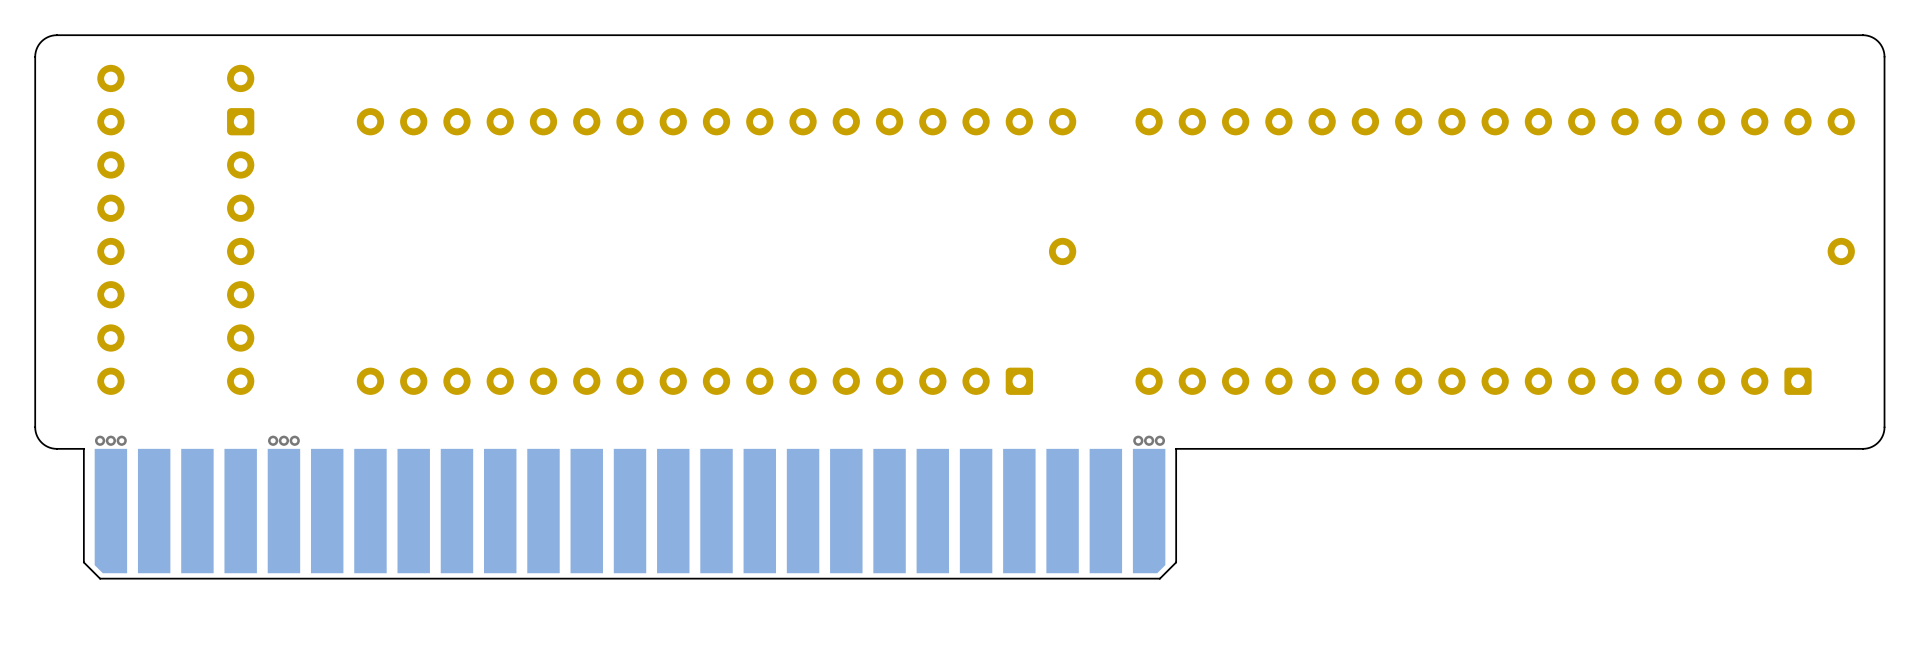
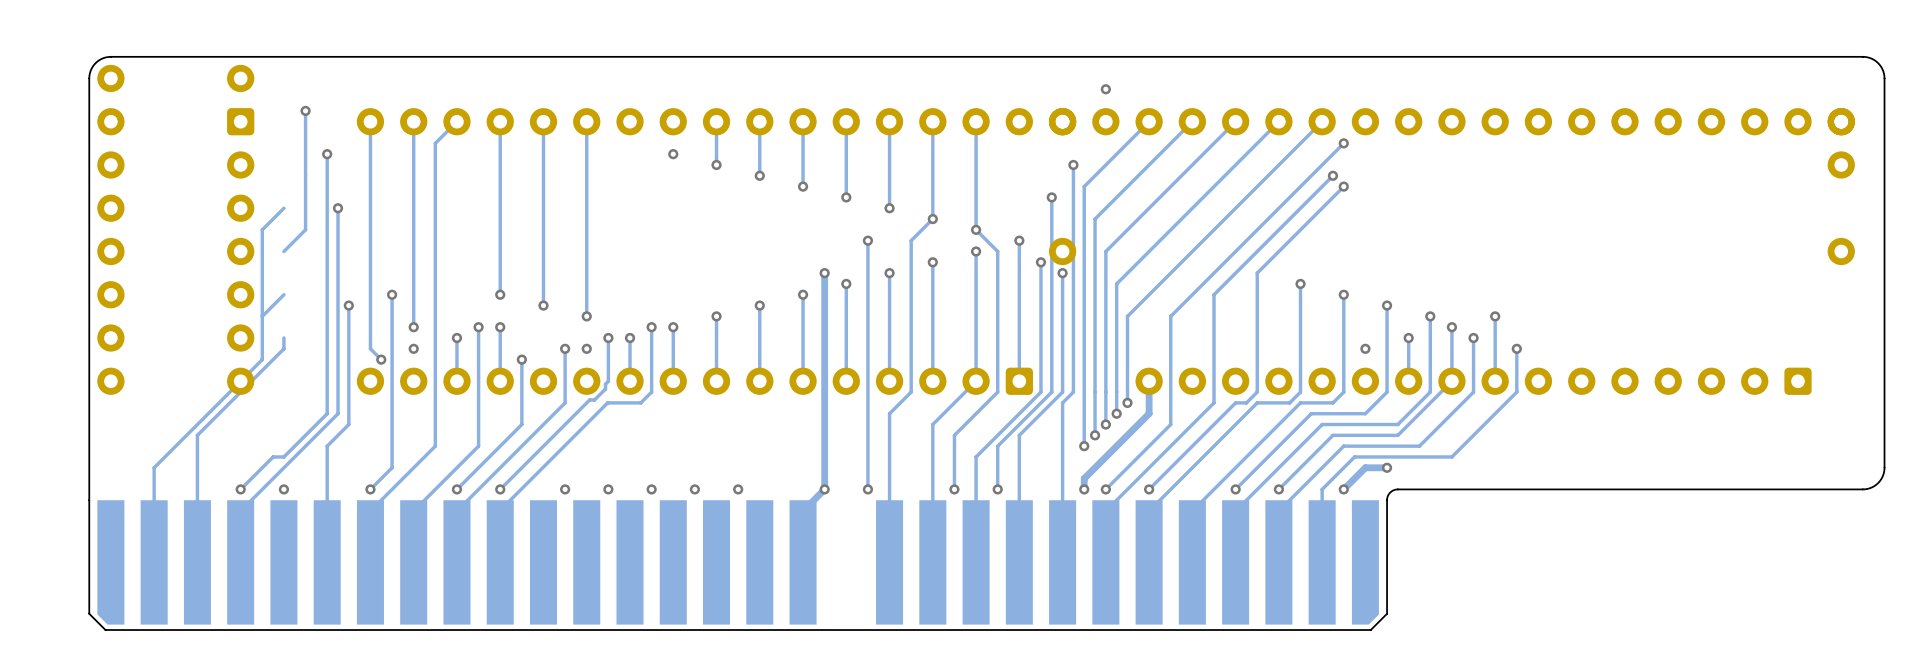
board edge: (1884, 78) (1884, 54) (1882, 47) (1874, 38) (1862, 35) (52, 35) (39, 43) (35, 56) (35, 429) (39, 440) (49, 447) (83, 448) -> (1884, 78) (1883, 71) (1878, 63) (1870, 58) (1862, 56) (106, 57) (93, 64) (89, 78) (89, 500)
via: none -> (1105, 89)
track: none -> (305, 110) (305, 229) (283, 251)
via: none -> (305, 110)
track: none -> (370, 121) (370, 348) (381, 359)
track: none -> (413, 121) (413, 327)
track: none -> (456, 121) (435, 143) (435, 446) (370, 511) (370, 562)
track: none -> (500, 121) (500, 294)
track: none -> (543, 121) (543, 305)
track: none -> (586, 121) (586, 316)
track: none -> (716, 121) (716, 164)
track: none -> (759, 121) (759, 175)
track: none -> (803, 121) (803, 186)
track: none -> (846, 121) (846, 197)
track: none -> (889, 121) (889, 208)
track: none -> (932, 121) (932, 219) (911, 240) (911, 392) (889, 413) (889, 562)
track: none -> (976, 121) (976, 229) (997, 251) (997, 392) (954, 435) (954, 489)
part: none -> (1084, 121)
track: none -> (1149, 121) (1084, 186) (1084, 446)
track: none -> (1192, 121) (1095, 219) (1095, 435)
track: none -> (1235, 121) (1105, 251) (1105, 424)
track: none -> (1278, 121) (1116, 283) (1116, 413)
track: none -> (1322, 121) (1127, 316) (1127, 402)
track: none -> (1343, 143) (1170, 316) (1170, 424) (1105, 489)
via: none -> (1343, 143)
part: none -> (1841, 143)
track: none -> (327, 154) (327, 413) (283, 456) (273, 456) (240, 489)
via: none -> (327, 154)
via: none -> (673, 154)
via: none -> (716, 164)
track: none -> (1073, 164) (1073, 392) (1062, 402) (1062, 562)
via: none -> (1073, 164)
via: none -> (759, 175)
track: none -> (1332, 175) (1214, 294) (1214, 402) (1105, 511) (1105, 562)
via: none -> (1332, 175)
via: none -> (803, 186)
track: none -> (1343, 186) (1257, 273) (1257, 392) (1246, 402) (1235, 402) (1149, 489)
via: none -> (1343, 186)
via: none -> (846, 197)
track: none -> (1051, 197) (1051, 392) (997, 446) (997, 489)
via: none -> (1051, 197)
track: none -> (283, 208) (262, 229) (262, 359) (154, 467) (154, 562)
track: none -> (338, 208) (338, 413) (240, 511) (240, 562)
via: none -> (338, 208)
via: none -> (889, 208)
via: none -> (932, 219)
via: none -> (976, 229)
track: none -> (867, 240) (867, 489)
via: none -> (867, 240)
track: none -> (1019, 240) (1019, 381)
via: none -> (1019, 240)
track: none -> (976, 251) (976, 381) (932, 424) (932, 562)
via: none -> (976, 251)
track: none -> (932, 262) (932, 381)
via: none -> (932, 262)
track: none -> (1040, 262) (1040, 392) (976, 456) (976, 562)
via: none -> (1040, 262)
track: none -> (824, 273) (824, 489) (803, 511) (803, 562)
via: none -> (824, 273)
track: none -> (889, 273) (889, 381)
via: none -> (889, 273)
track: none -> (1062, 273) (1062, 392) (1019, 435) (1019, 562)
via: none -> (1062, 273)
track: none -> (846, 283) (846, 381)
via: none -> (846, 283)
track: none -> (1300, 283) (1300, 392) (1289, 402) (1257, 402) (1149, 511) (1149, 562)
via: none -> (1300, 283)
track: none -> (283, 294) (262, 316)
track: none -> (392, 294) (392, 467) (370, 489)
via: none -> (392, 294)
via: none -> (500, 294)
track: none -> (803, 294) (803, 381)
via: none -> (803, 294)
track: none -> (1343, 294) (1343, 392) (1332, 402) (1300, 402) (1192, 511) (1192, 562)
via: none -> (1343, 294)
track: none -> (348, 305) (348, 424) (327, 446) (327, 562)
via: none -> (348, 305)
via: none -> (543, 305)
track: none -> (759, 305) (759, 381)
via: none -> (759, 305)
track: none -> (1387, 305) (1387, 392) (1365, 413) (1311, 413) (1235, 489)
via: none -> (1387, 305)
via: none -> (586, 316)
track: none -> (716, 316) (716, 381)
via: none -> (716, 316)
track: none -> (1430, 316) (1430, 392) (1397, 424) (1322, 424) (1235, 511) (1235, 562)
via: none -> (1430, 316)
track: none -> (1495, 316) (1495, 381)
via: none -> (1495, 316)
via: none -> (413, 327)
track: none -> (478, 327) (478, 446) (413, 511) (413, 562)
via: none -> (478, 327)
track: none -> (500, 327) (500, 381)
via: none -> (500, 327)
track: none -> (651, 327) (651, 392) (640, 402) (607, 402) (500, 510) (500, 562)
via: none -> (651, 327)
track: none -> (673, 327) (673, 381)
via: none -> (673, 327)
track: none -> (1451, 327) (1451, 381) (1397, 435) (1332, 435) (1278, 489)
via: none -> (1451, 327)
track: none -> (283, 338) (283, 348) (197, 435) (197, 562)
track: none -> (456, 338) (456, 381)
via: none -> (456, 338)
track: none -> (608, 338) (608, 381) (605, 384) (605, 389) (594, 400) (589, 400) (500, 489)
via: none -> (608, 338)
track: none -> (630, 338) (630, 381)
via: none -> (630, 338)
track: none -> (1408, 338) (1408, 381)
via: none -> (1408, 338)
track: none -> (1473, 338) (1473, 392) (1419, 446) (1343, 446) (1278, 511) (1278, 562)
via: none -> (1473, 338)
via: none -> (413, 348)
track: none -> (565, 348) (565, 402) (456, 511) (456, 562)
via: none -> (565, 348)
via: none -> (586, 348)
via: none -> (1365, 348)
track: none -> (1516, 348) (1516, 392) (1451, 456) (1354, 456) (1322, 489) (1322, 562)
via: none -> (1516, 348)
via: none -> (381, 359)
track: none -> (521, 359) (521, 424) (456, 489)
via: none -> (521, 359)
track: none -> (1149, 381) (1149, 413) (1084, 478) (1084, 489)
via: none -> (1127, 402)
via: none -> (1116, 413)
via: none -> (1105, 424)
board edge: (1884, 427) (1882, 436) (1878, 442) (1870, 447) (1862, 448) (1176, 448) -> (1884, 427) (1883, 474) (1876, 484) (1865, 489) (1397, 489) (1390, 492) (1387, 500)
via: none -> (1095, 435)
via: (100, 440) -> none
via: (110, 440) -> none
via: (121, 440) -> none
via: (273, 440) -> none
via: (283, 440) -> none
via: (294, 440) -> none
via: (1138, 440) -> none
via: (1149, 440) -> none
via: (1159, 440) -> none
via: none -> (1084, 446)
track: none -> (1387, 467) (1365, 467) (1343, 489)
via: none -> (1387, 467)
via: none -> (240, 489)
via: none -> (283, 489)
via: none -> (370, 489)
via: none -> (456, 489)
via: none -> (500, 489)
via: none -> (565, 489)
via: none -> (608, 489)
via: none -> (651, 489)
via: none -> (694, 489)
via: none -> (738, 489)
via: none -> (824, 489)
via: none -> (867, 489)
via: none -> (954, 489)
via: none -> (997, 489)
via: none -> (1084, 489)
via: none -> (1105, 489)
via: none -> (1149, 489)
via: none -> (1235, 489)
via: none -> (1278, 489)
via: none -> (1343, 489)
part: (630, 513) -> none
part: none -> (738, 565)

